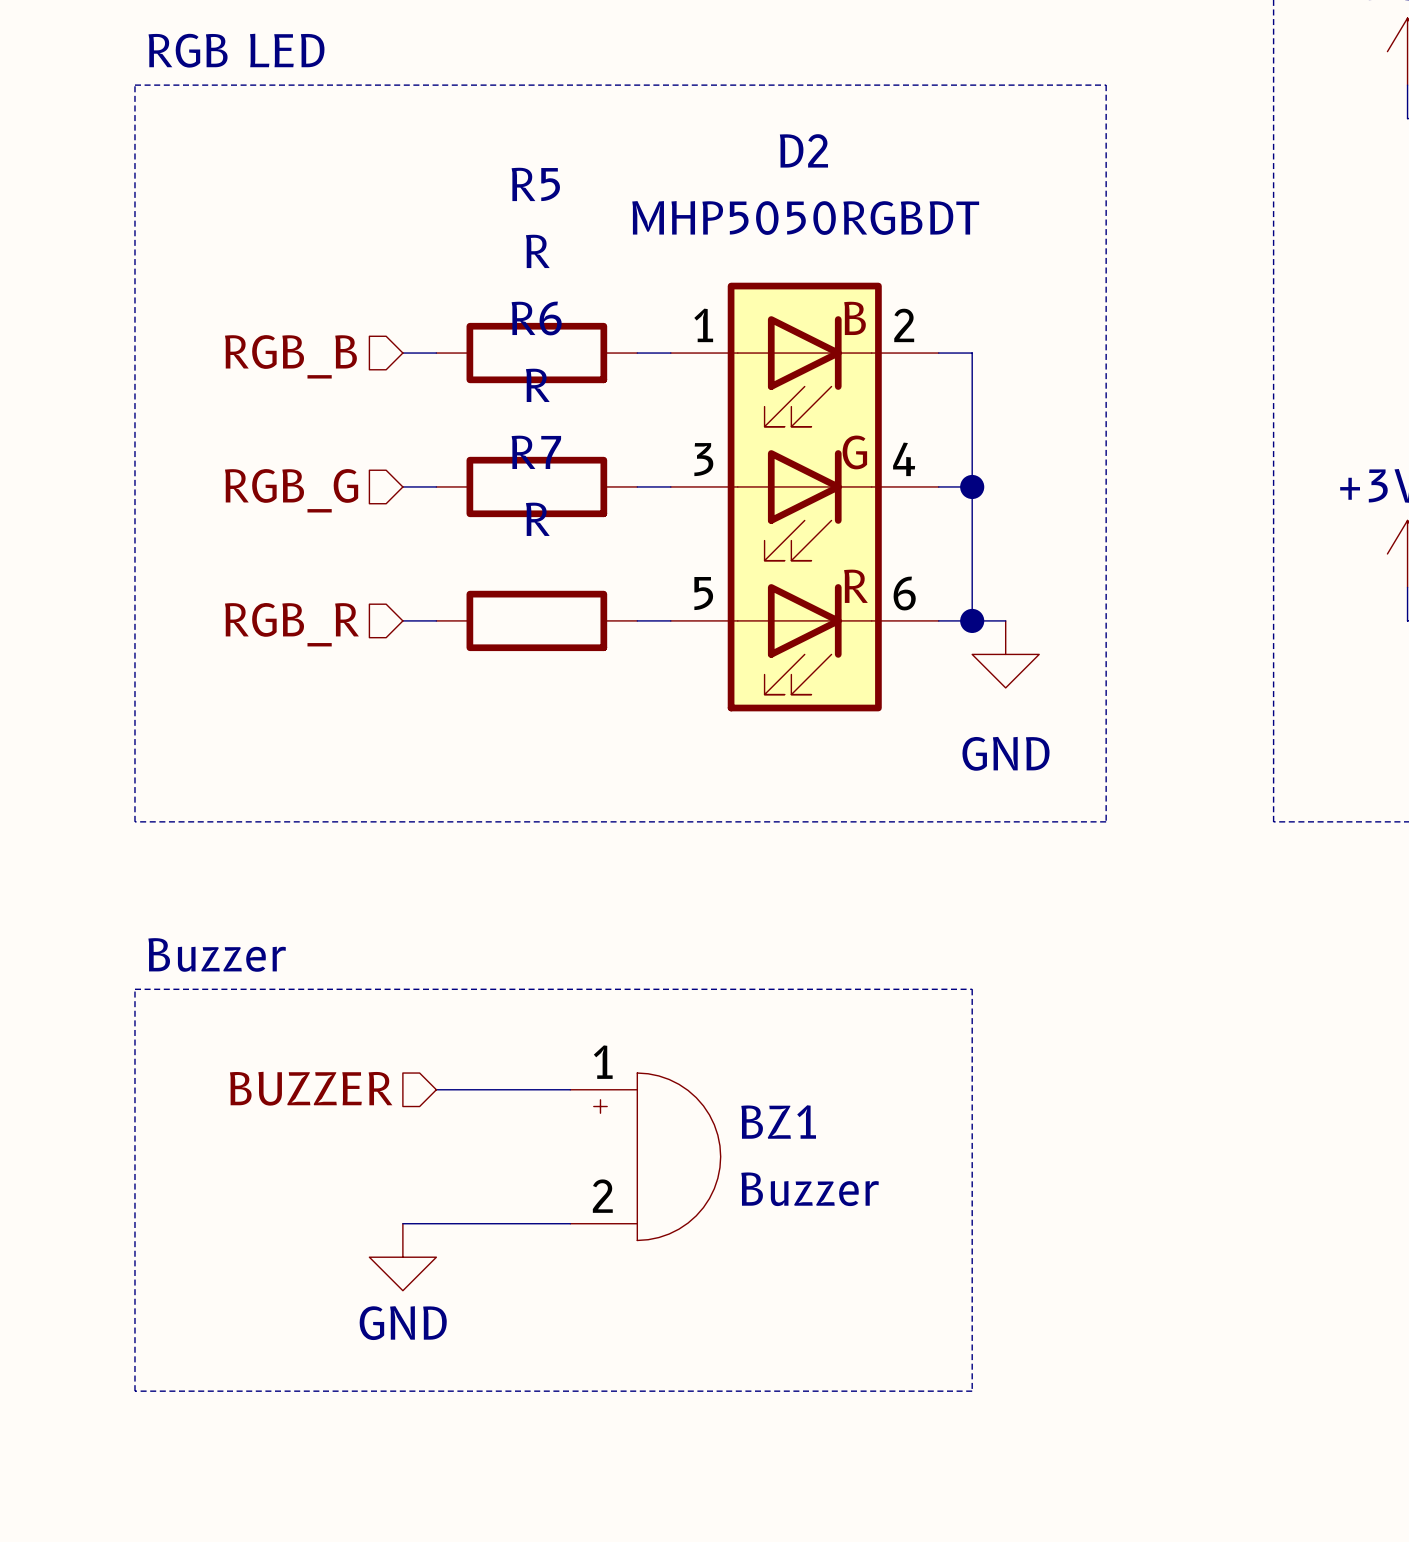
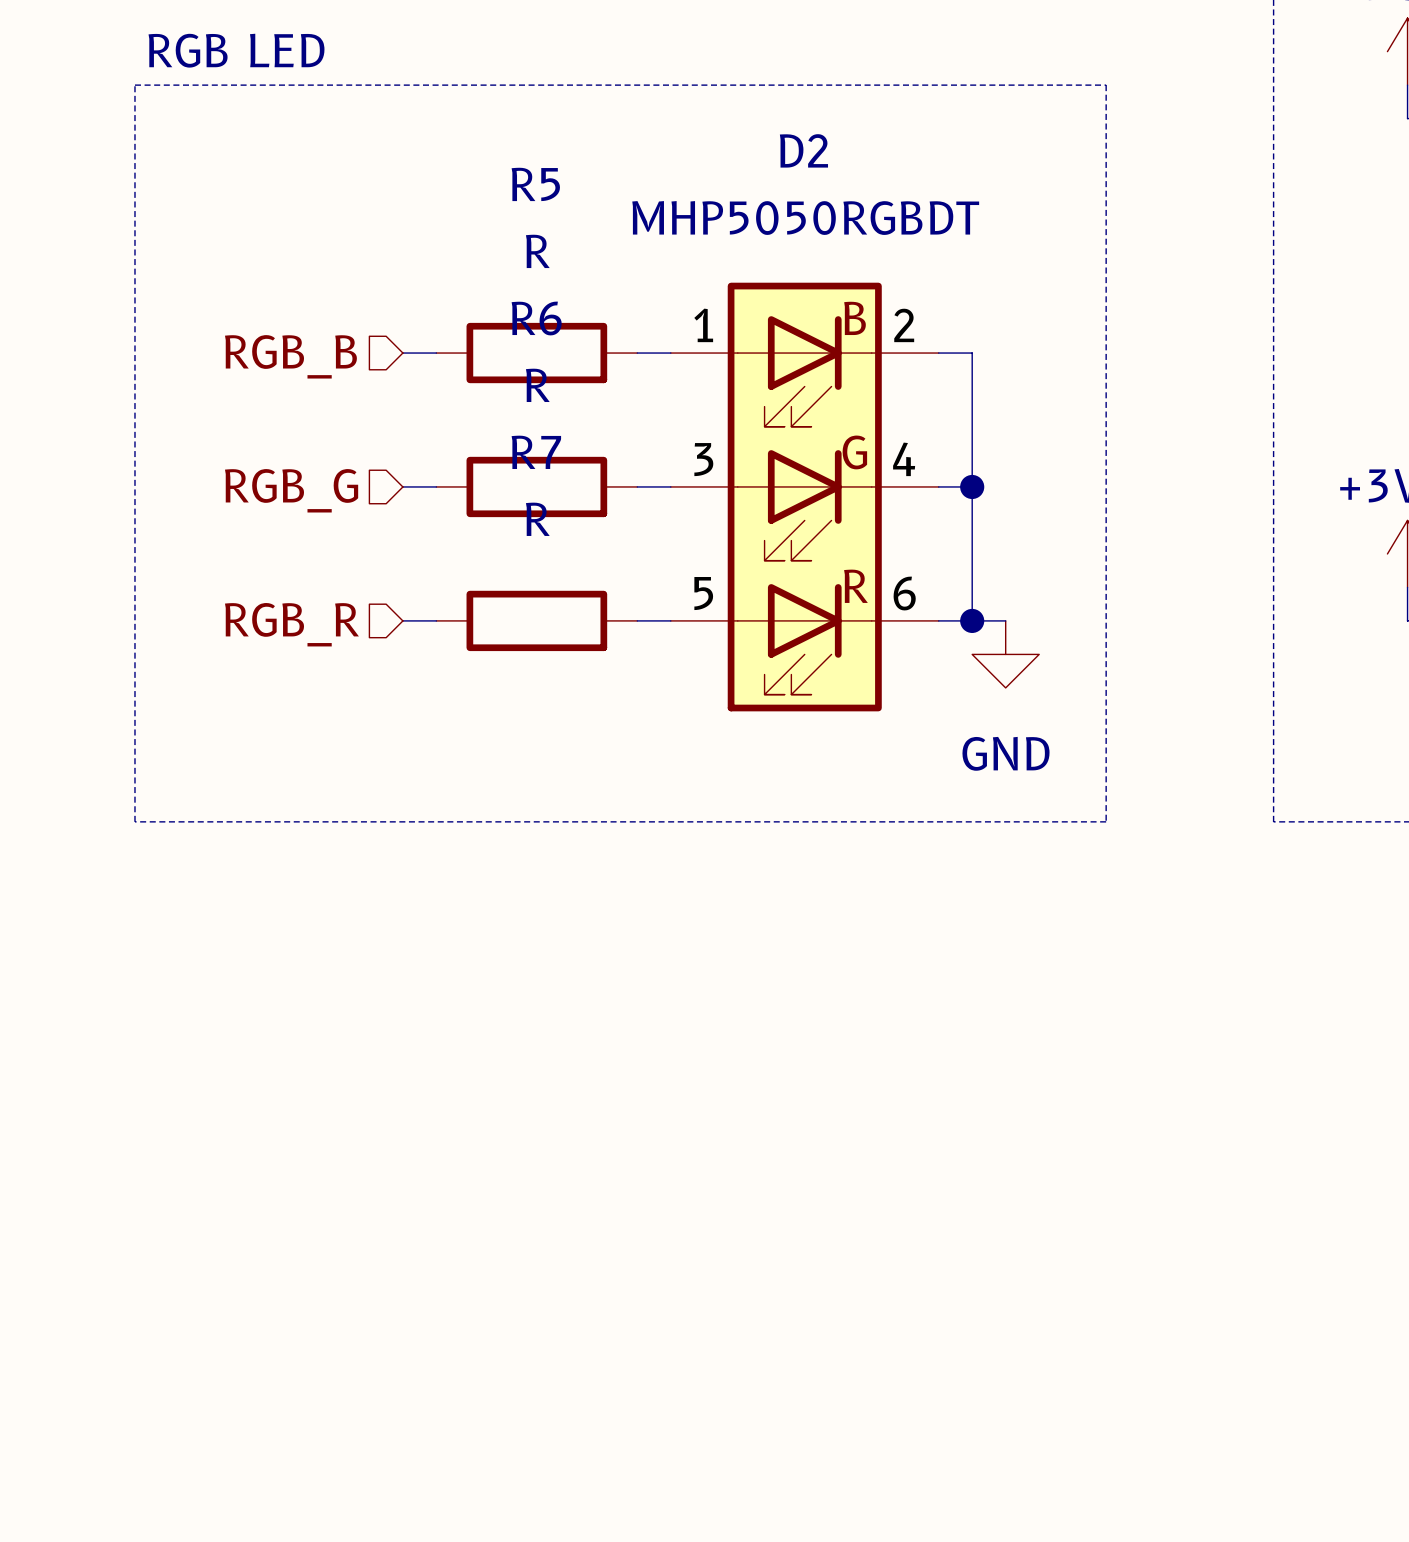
text: Buzzer (217, 954) -> none
line: (134, 989) (972, 989) (972, 1391) (134, 1391) (134, 989) -> none
hierarchical label: BUZZER (311, 1088) -> none
wire: (436, 1089) (570, 1089) -> none
BZ1: Buzzer (645, 1156) -> none
wire: (402, 1223) (570, 1223) -> none
power symbol: GND (402, 1257) -> none

